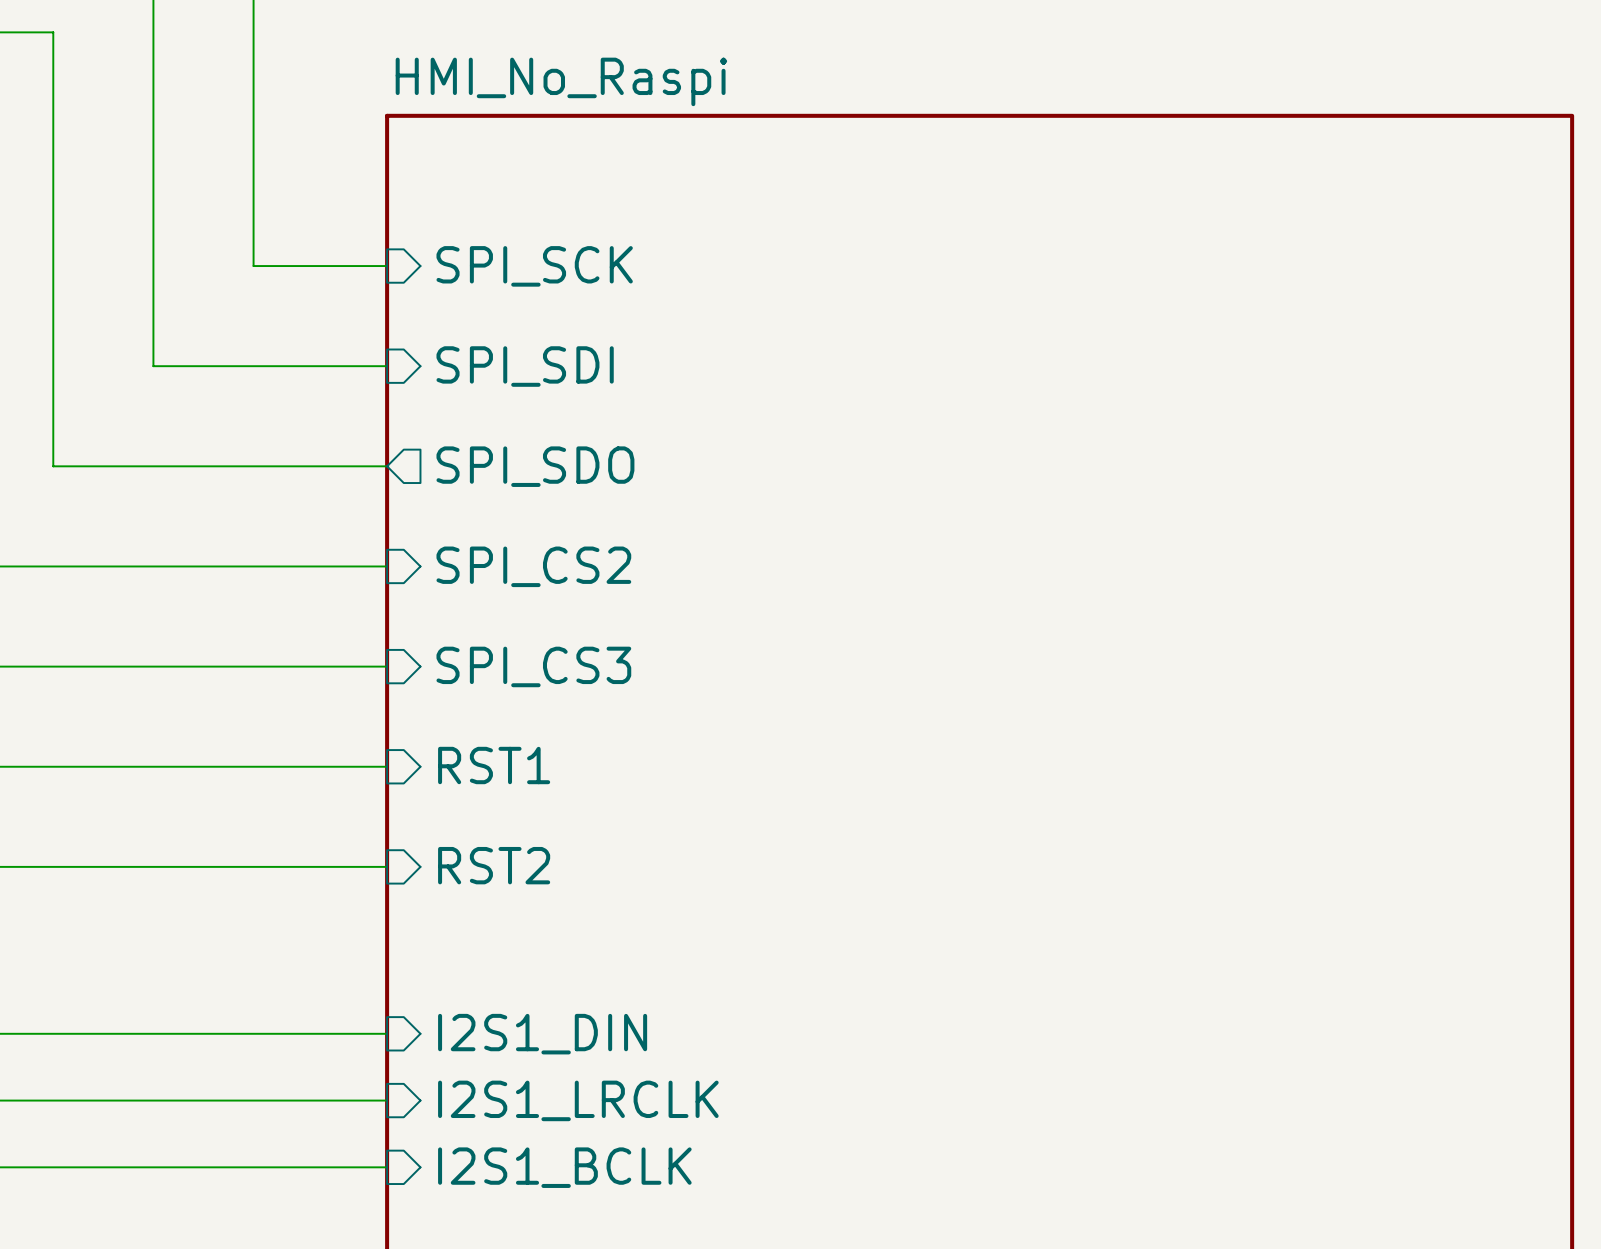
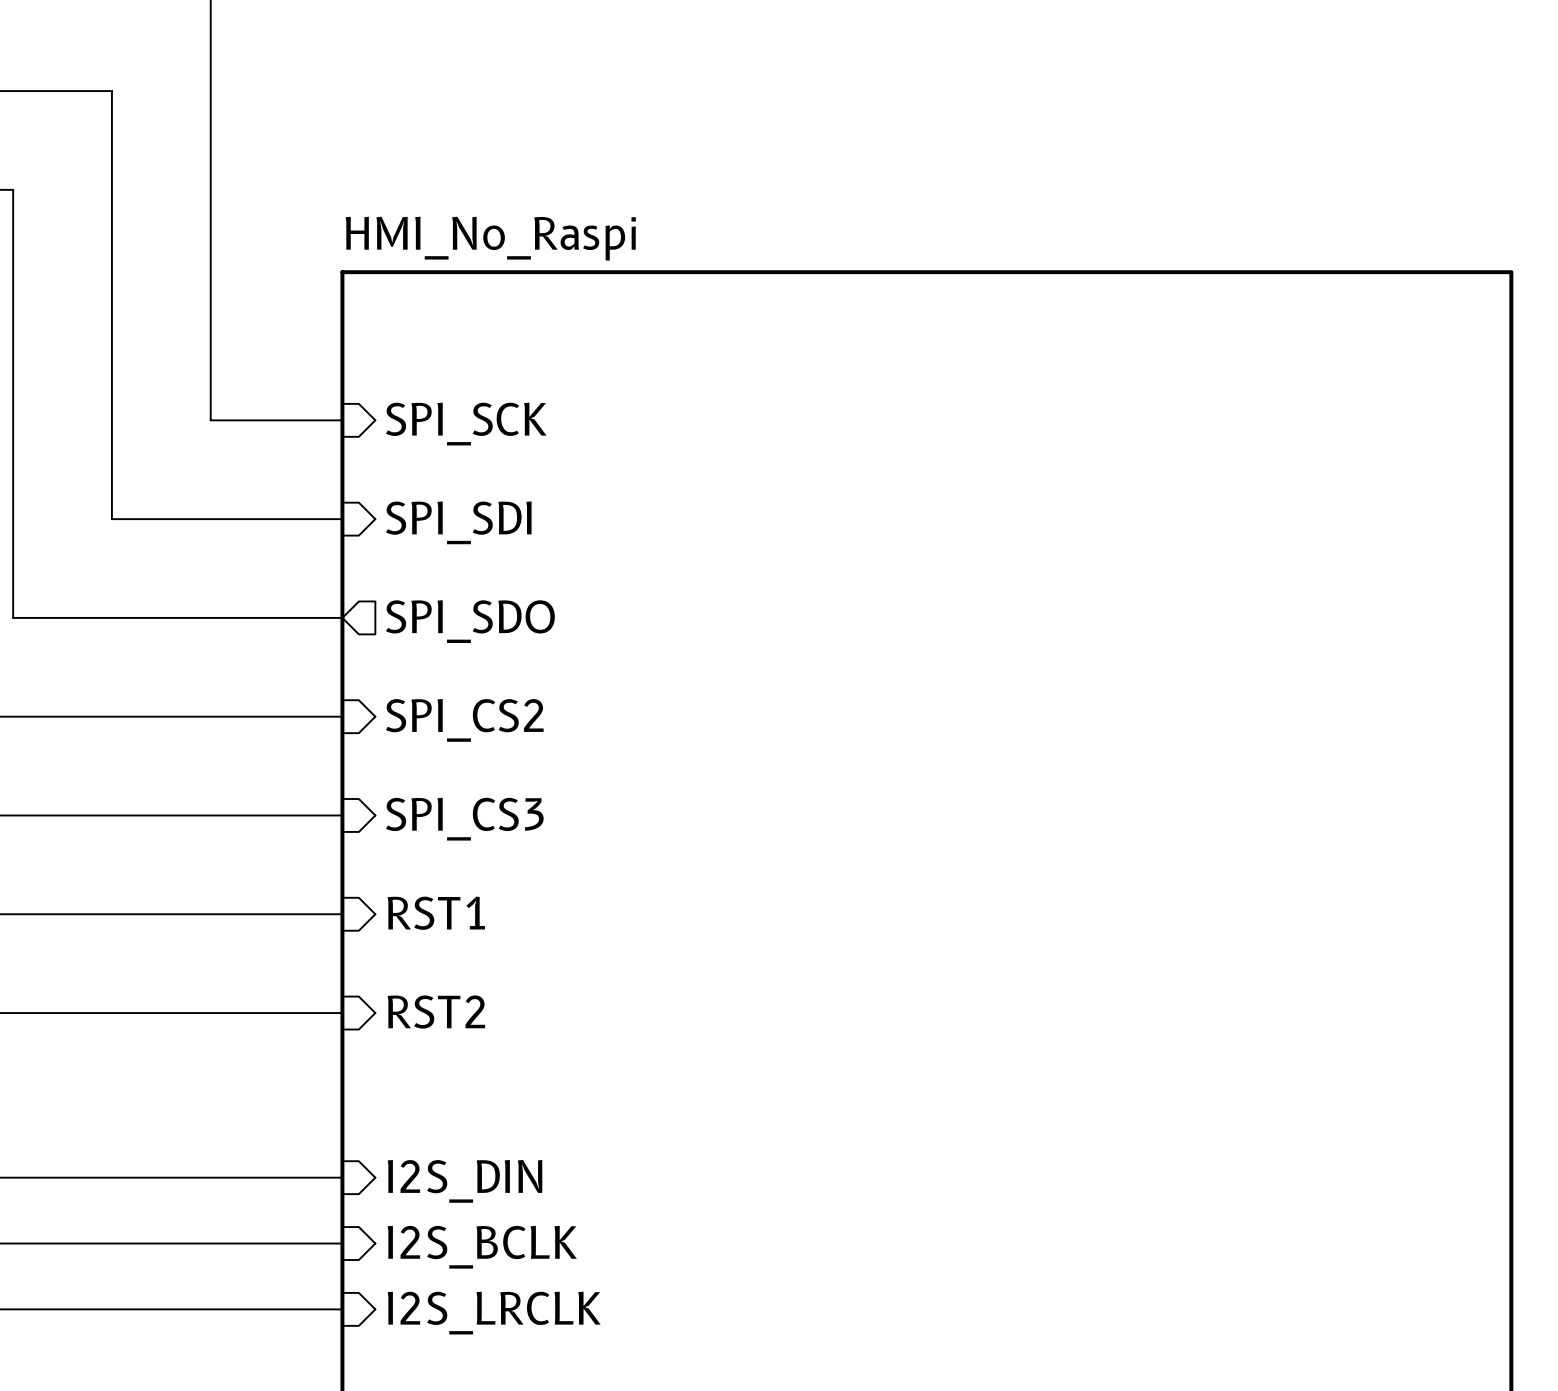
sheet pin: I2S1_DIN (542, 1034) -> I2S_DIN (465, 1181)
sheet pin: I2S1_LRCLK (578, 1100) -> I2S_BCLK (482, 1247)
sheet pin: I2S1_BCLK (564, 1167) -> I2S_LRCLK (494, 1313)

